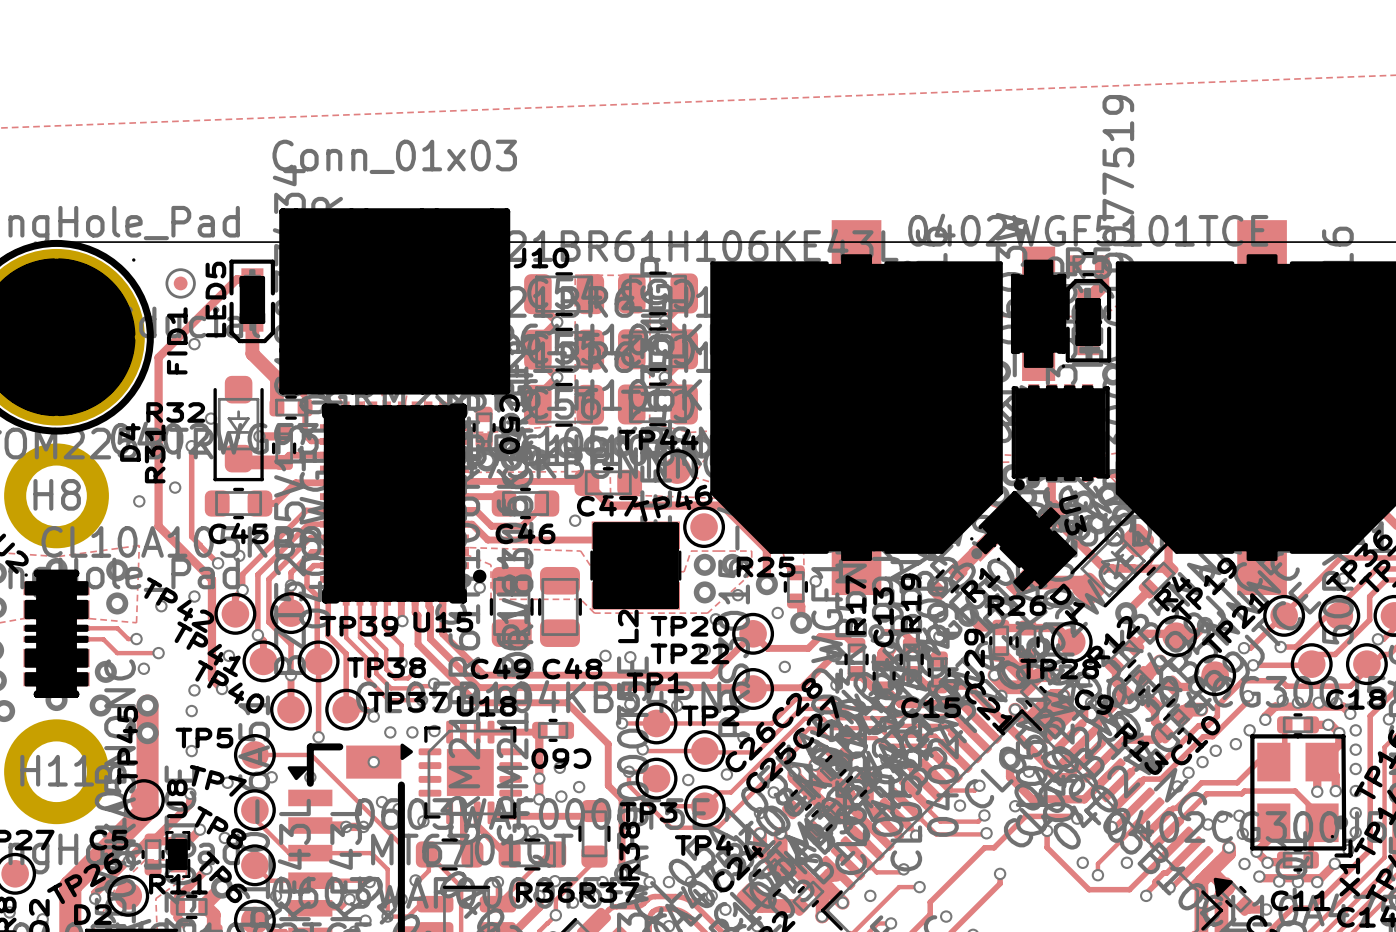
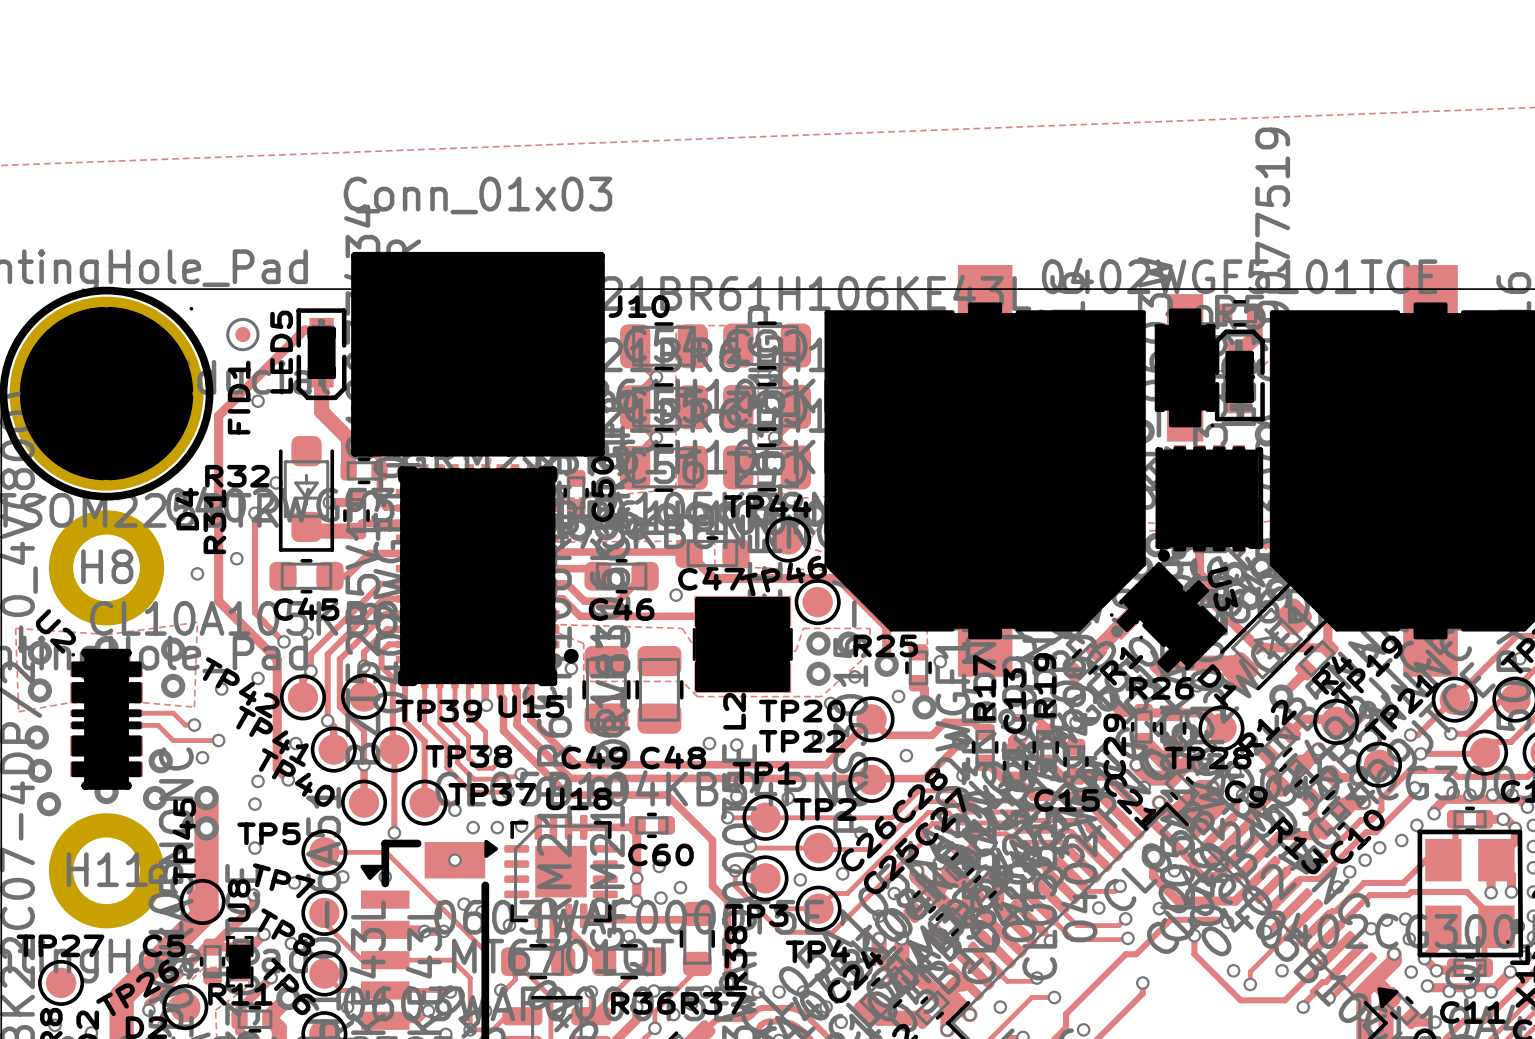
C50 name rotation: 0° (509, 424) -> 180° (602, 489)
C60 name rotation: 0° (561, 758) -> 180° (660, 854)

